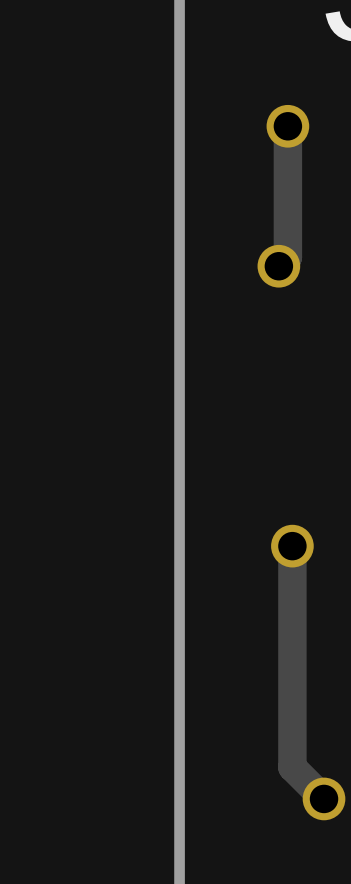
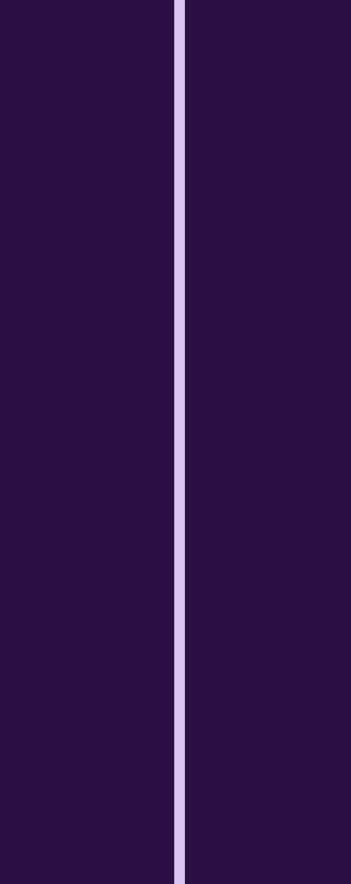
track: (287, 126) (287, 257) (278, 266) -> none
via: (287, 126) -> none
via: (278, 266) -> none
track: (292, 546) (292, 767) (324, 798) -> none
via: (292, 546) -> none
via: (324, 798) -> none

